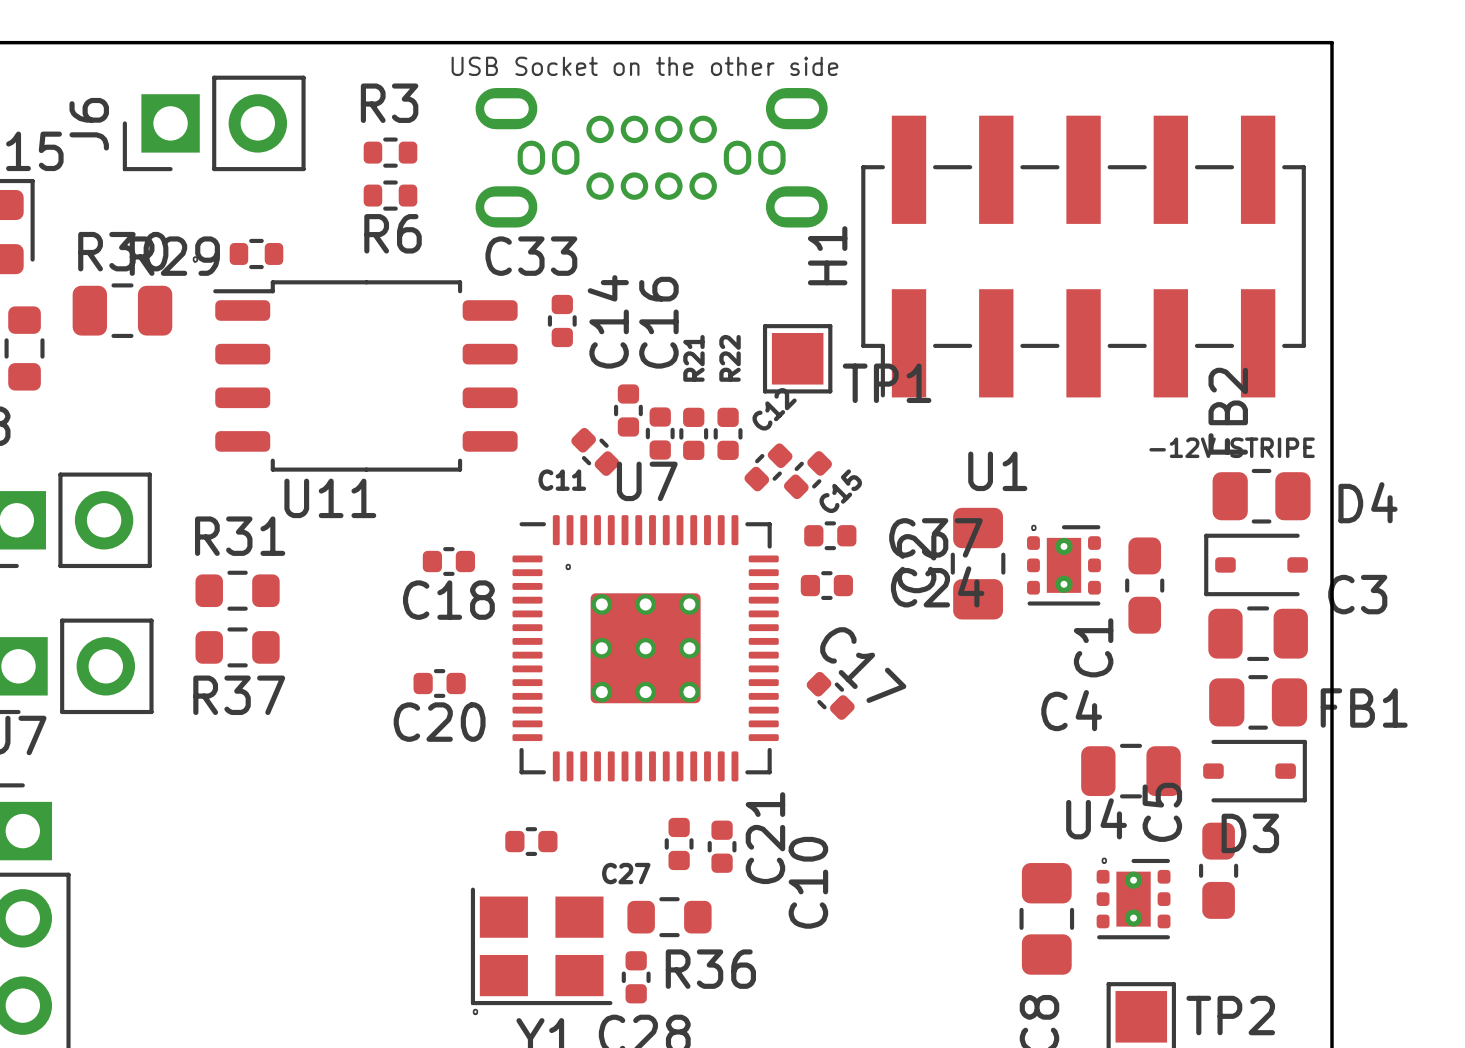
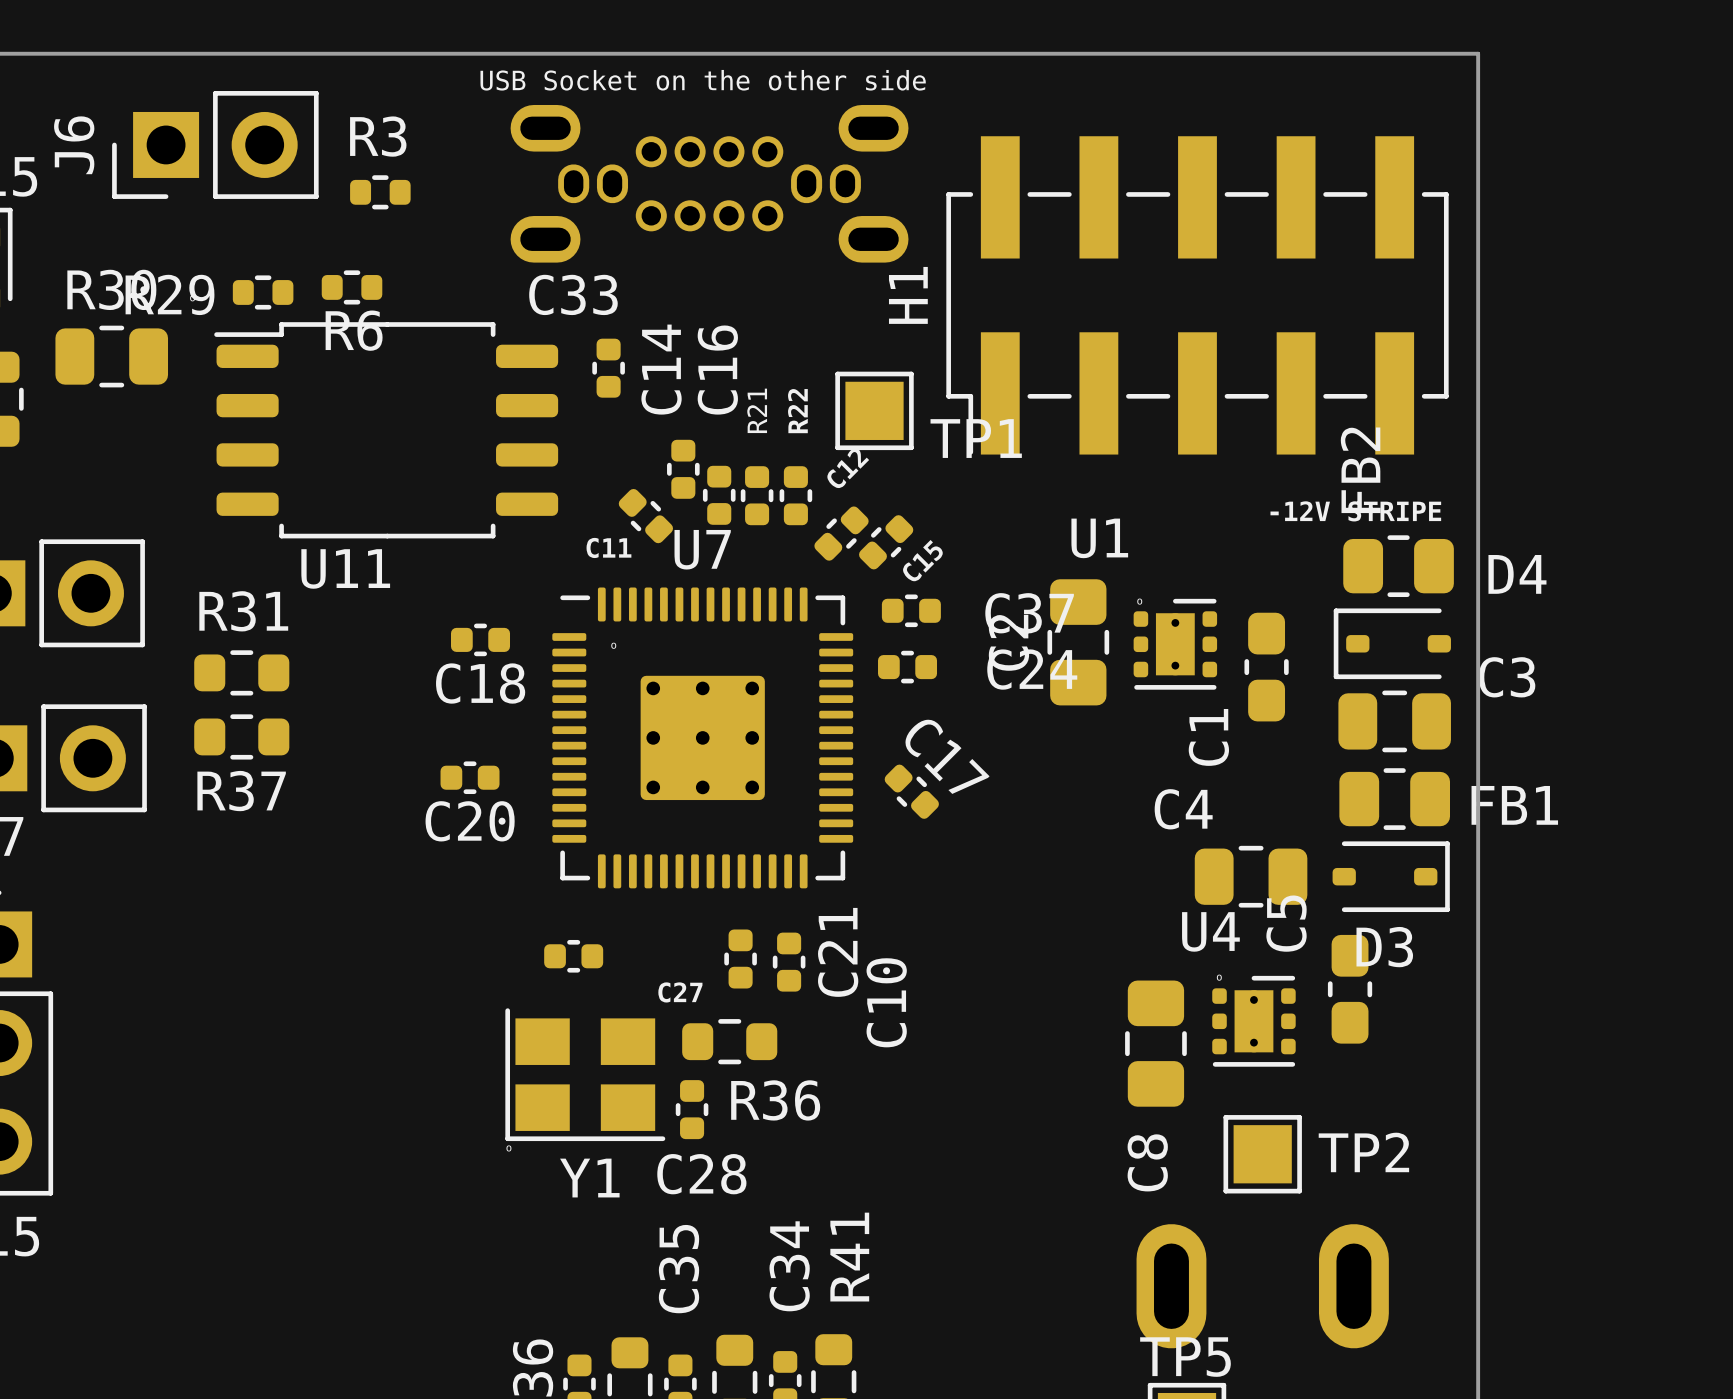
R3 position: (390, 152) -> (380, 192)
R6 position: (390, 195) -> (352, 287)

